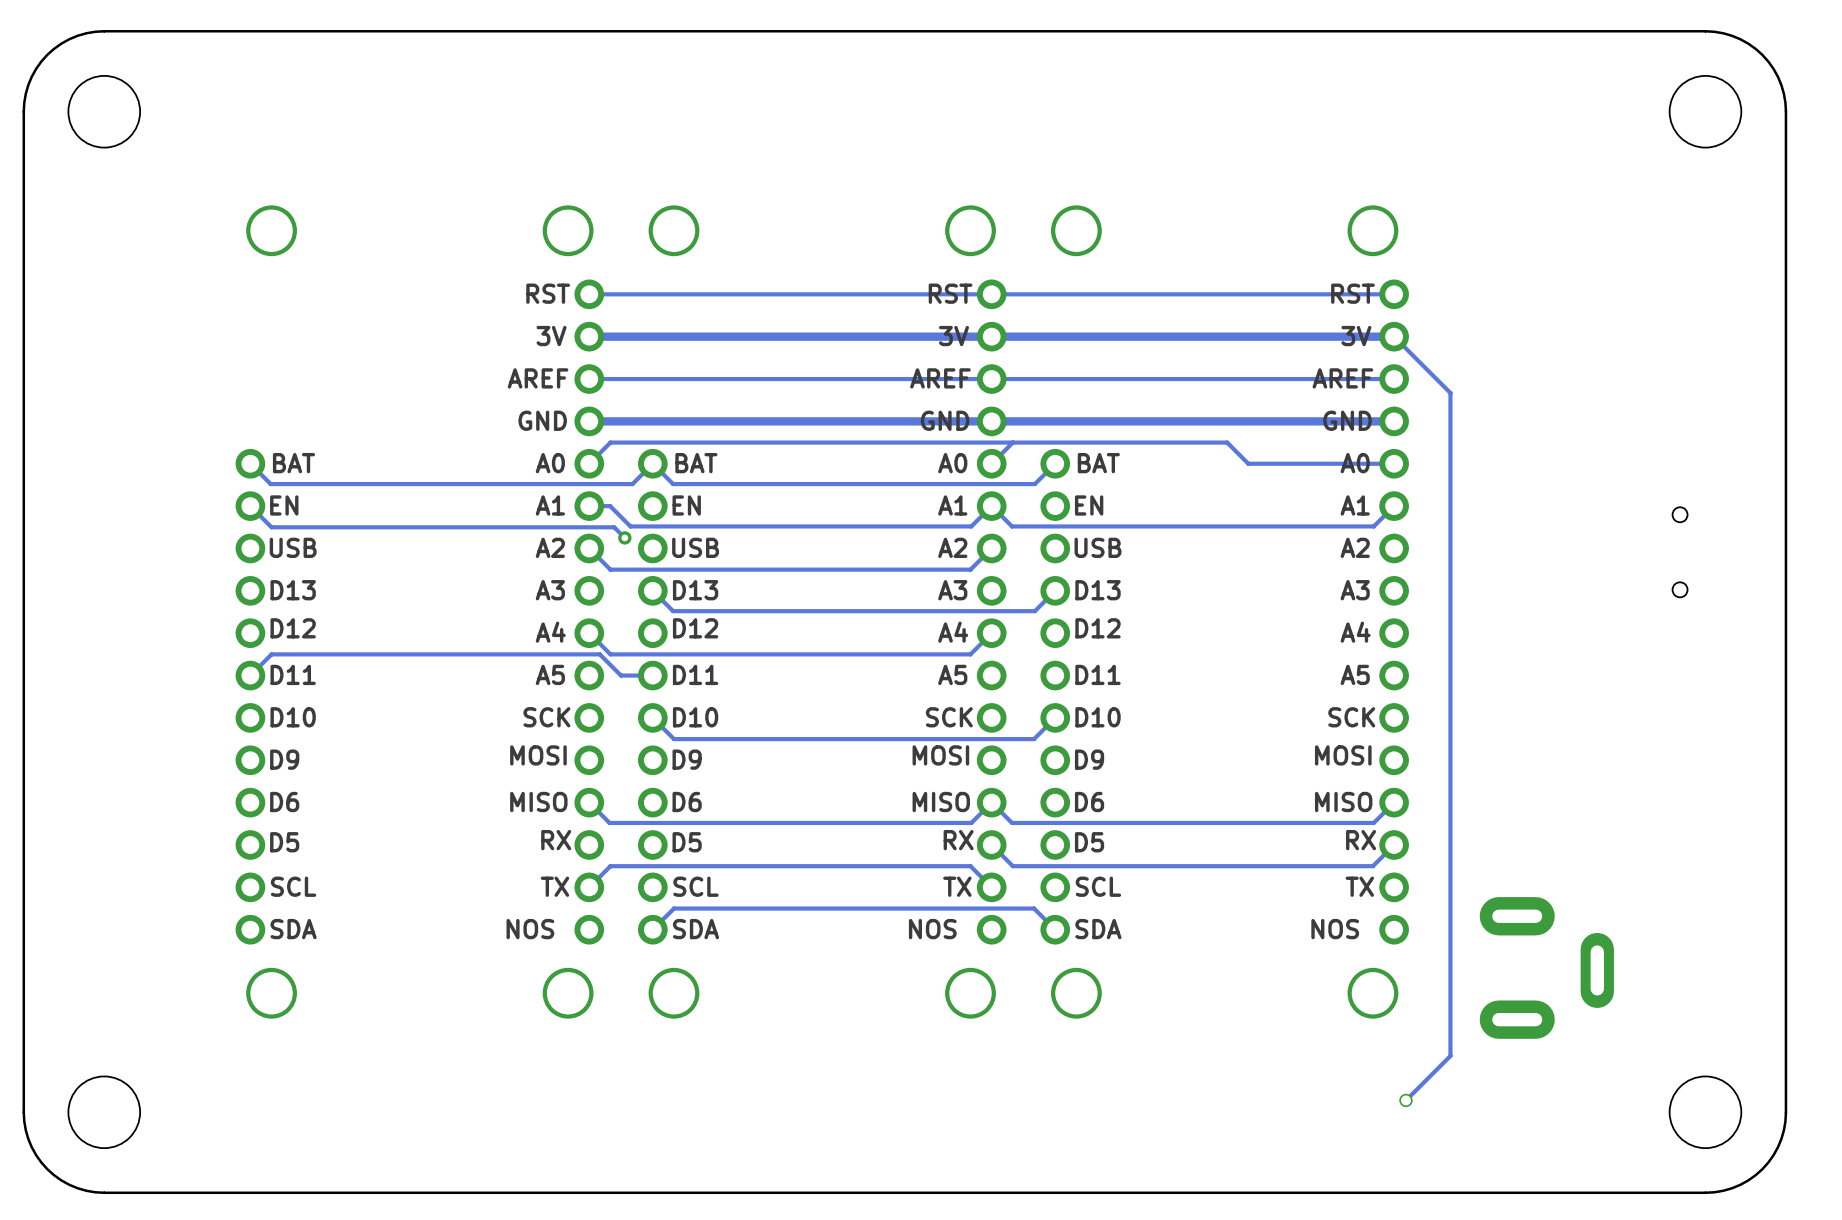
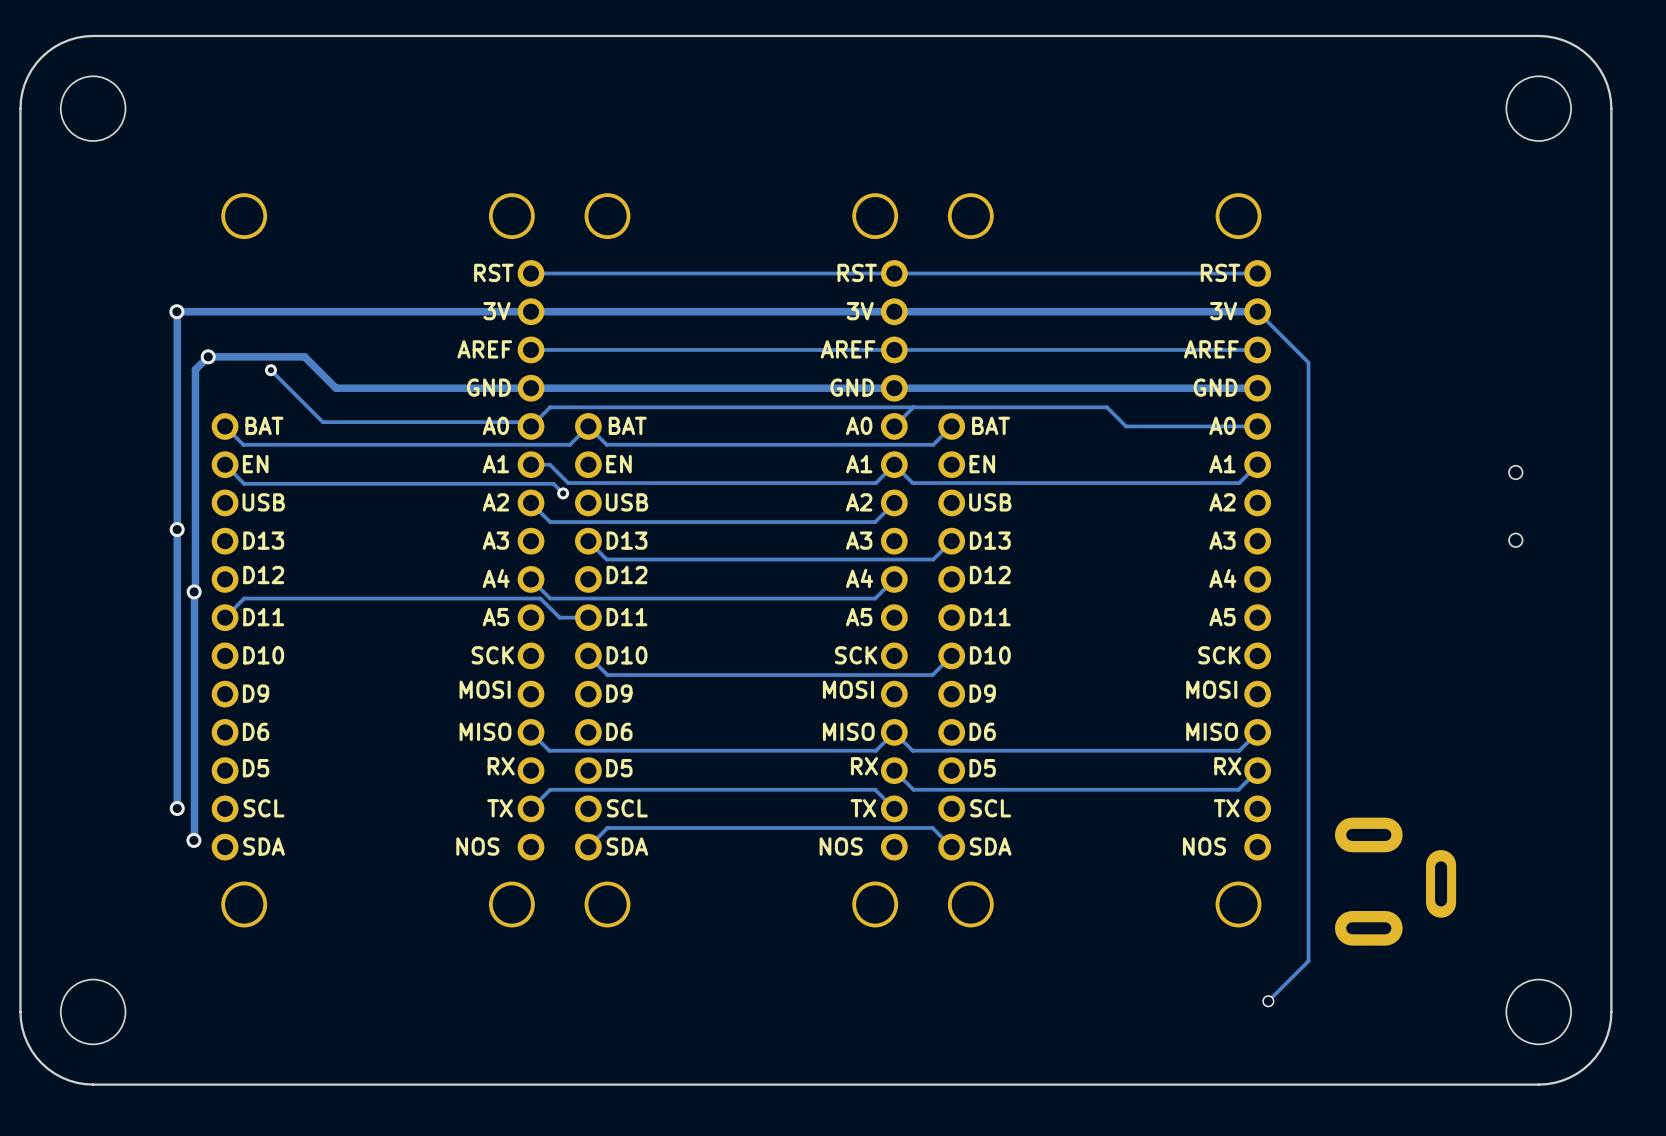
via: none -> (176, 311)
track: none -> (531, 311) (176, 311) (177, 529)
via: none -> (208, 356)
track: none -> (270, 370) (322, 422) (535, 422)
via: none -> (270, 370)
track: none -> (531, 388) (335, 388) (304, 356) (208, 356) (195, 369) (193, 840)
via: none -> (177, 529)
track: none -> (177, 529) (177, 808)
via: none -> (194, 591)
via: none -> (177, 808)
via: none -> (193, 840)

